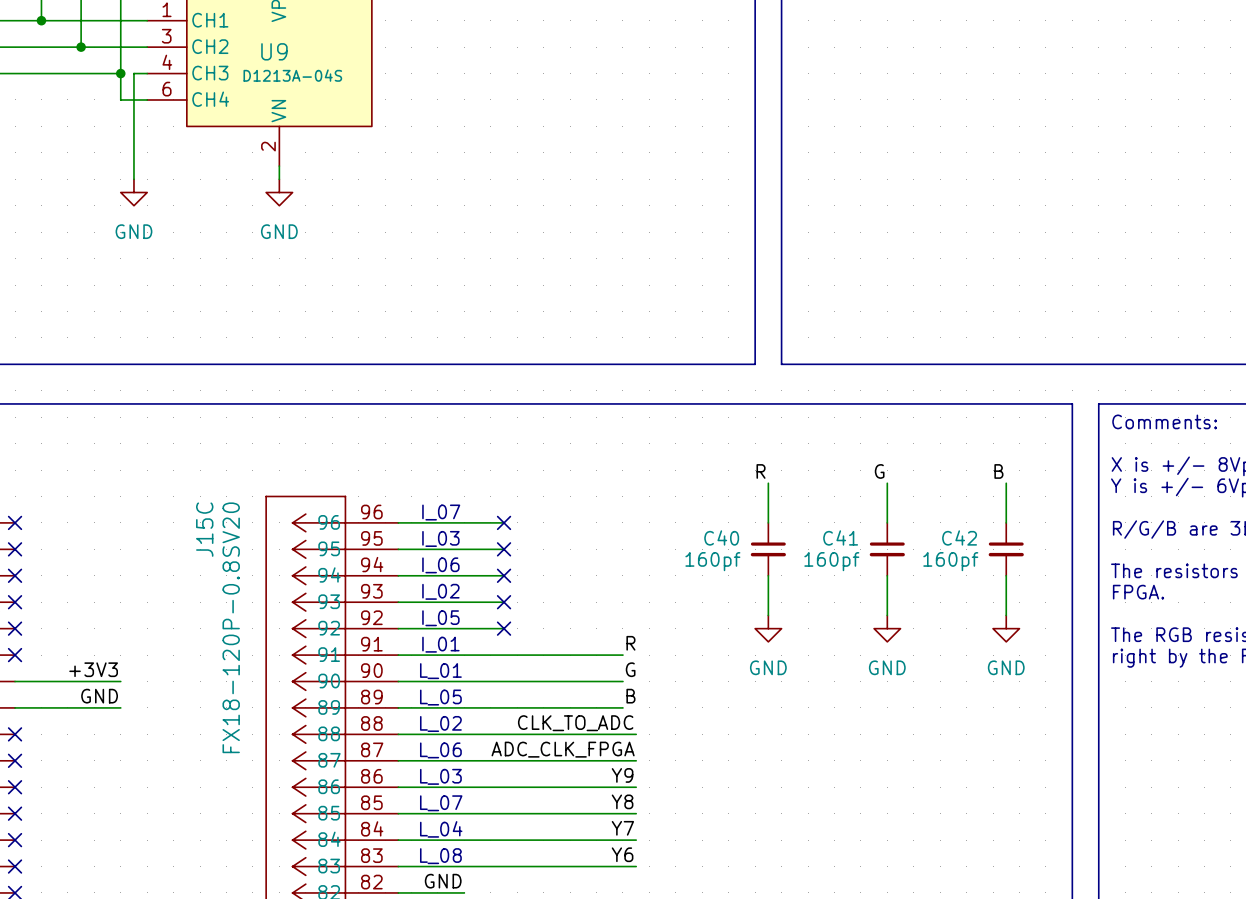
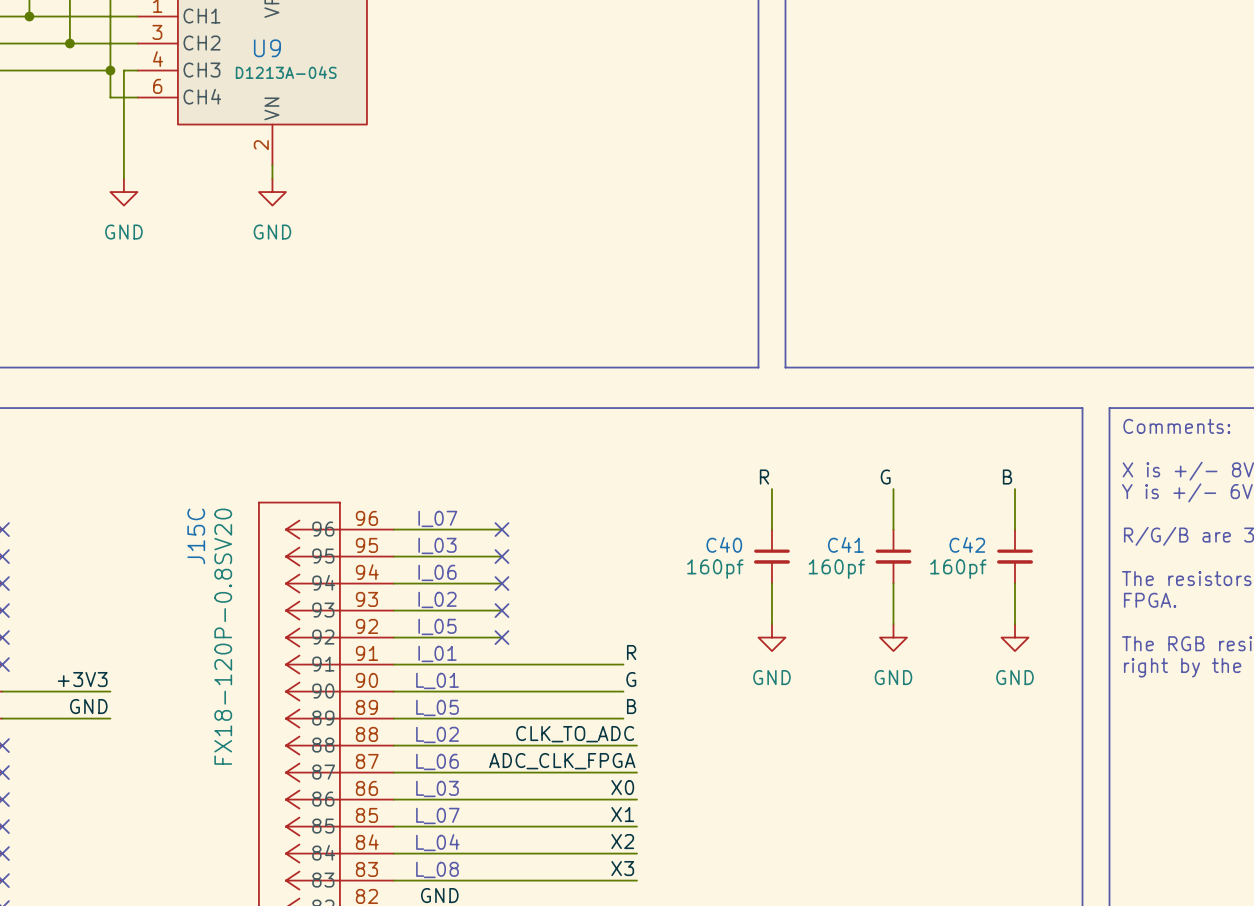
label: Y9 (622, 775) -> X0 (622, 787)
label: Y8 (622, 801) -> X1 (622, 814)
label: Y7 (622, 828) -> X2 (622, 841)
label: Y6 (622, 854) -> X3 (622, 868)

